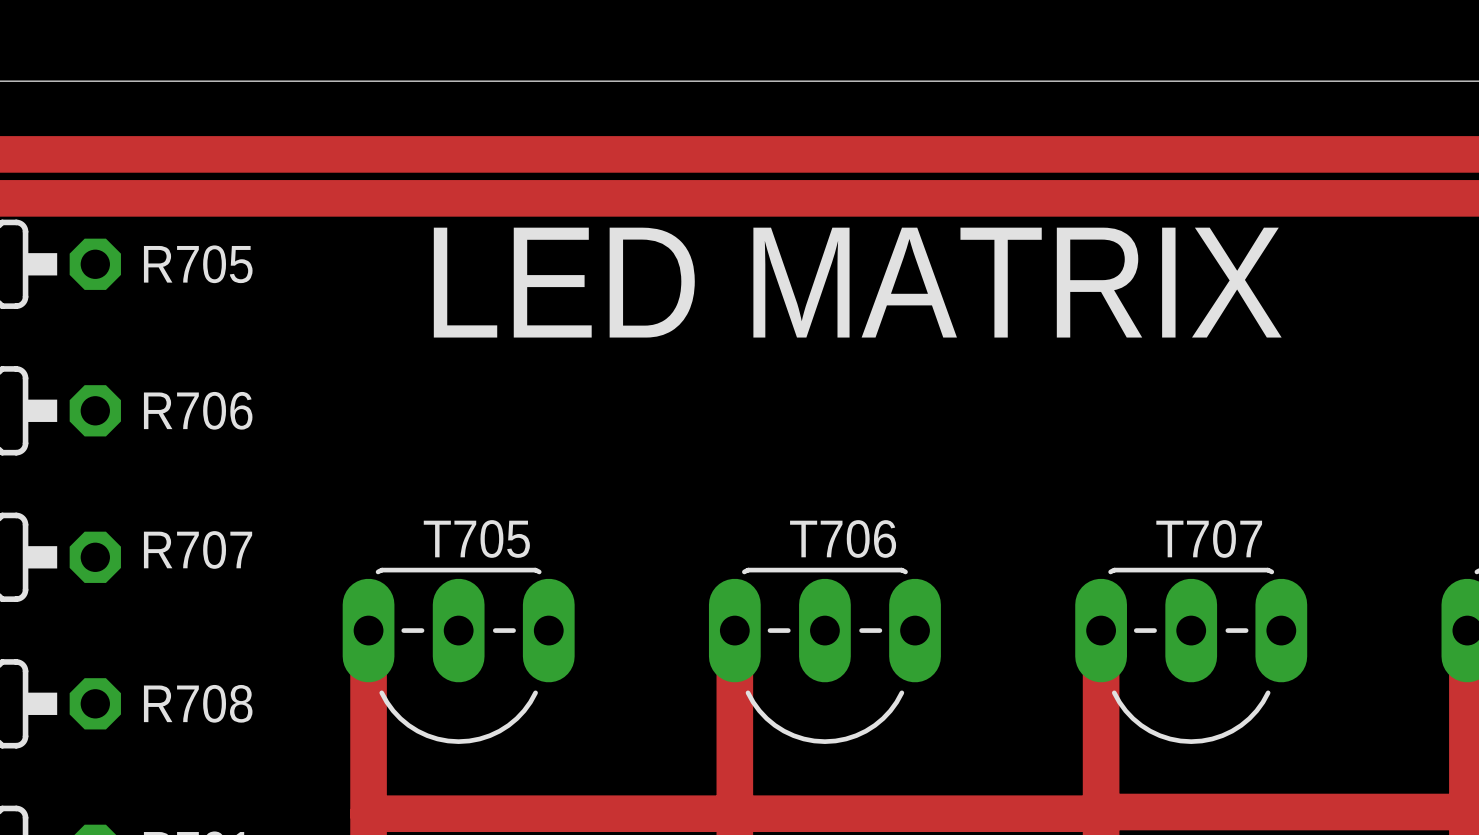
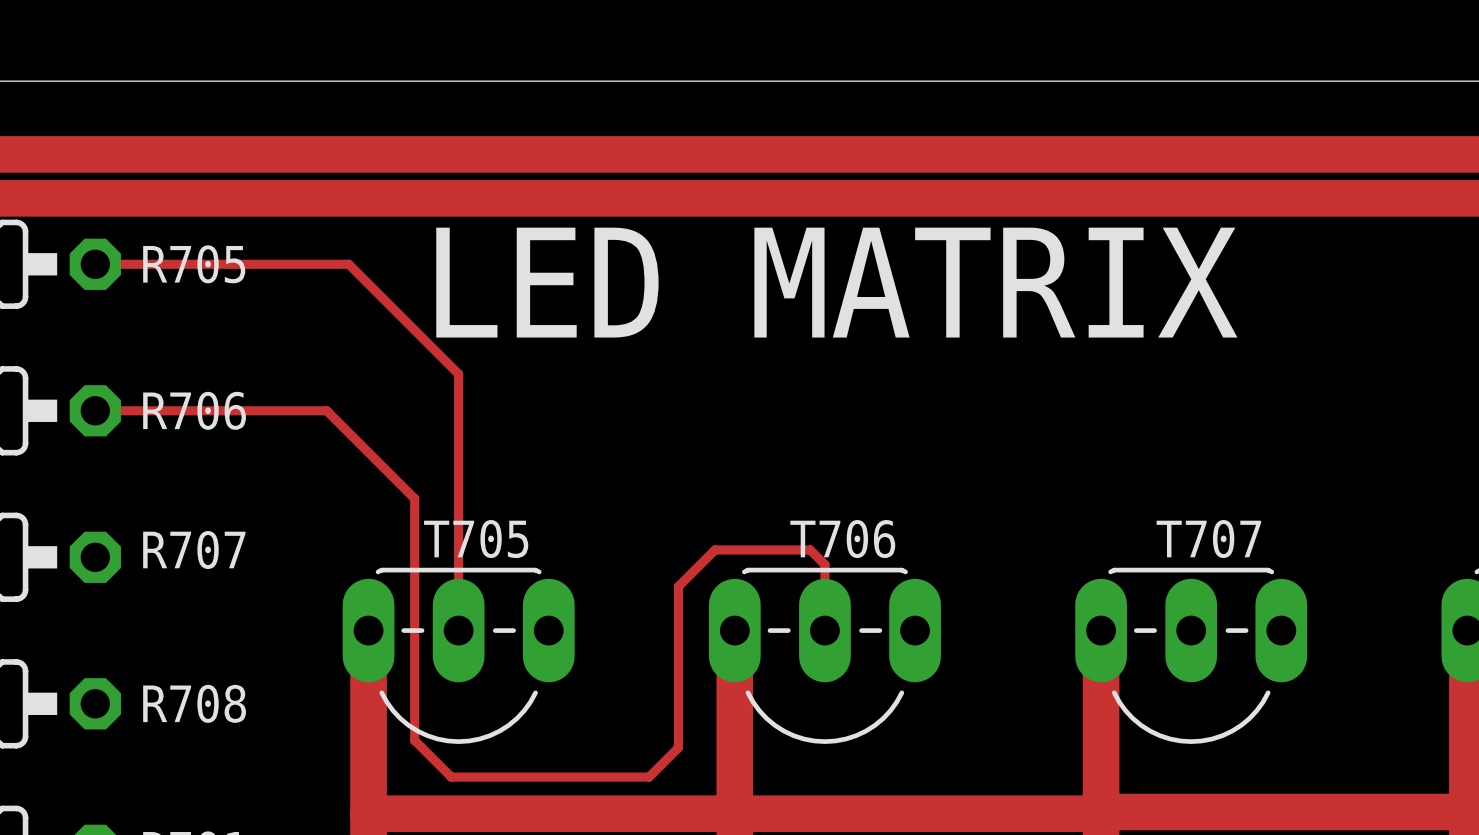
track: none -> (95, 264) (348, 264) (458, 374) (458, 630)
track: none -> (95, 410) (326, 410) (414, 498) (414, 740) (451, 777) (649, 777) (678, 747) (678, 586) (715, 549) (810, 549) (824, 564) (824, 630)

